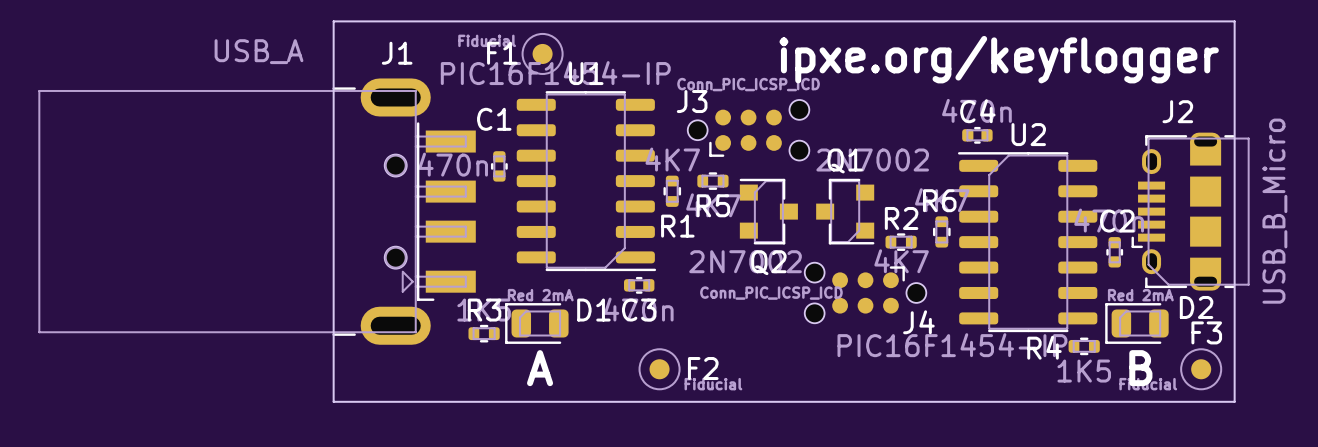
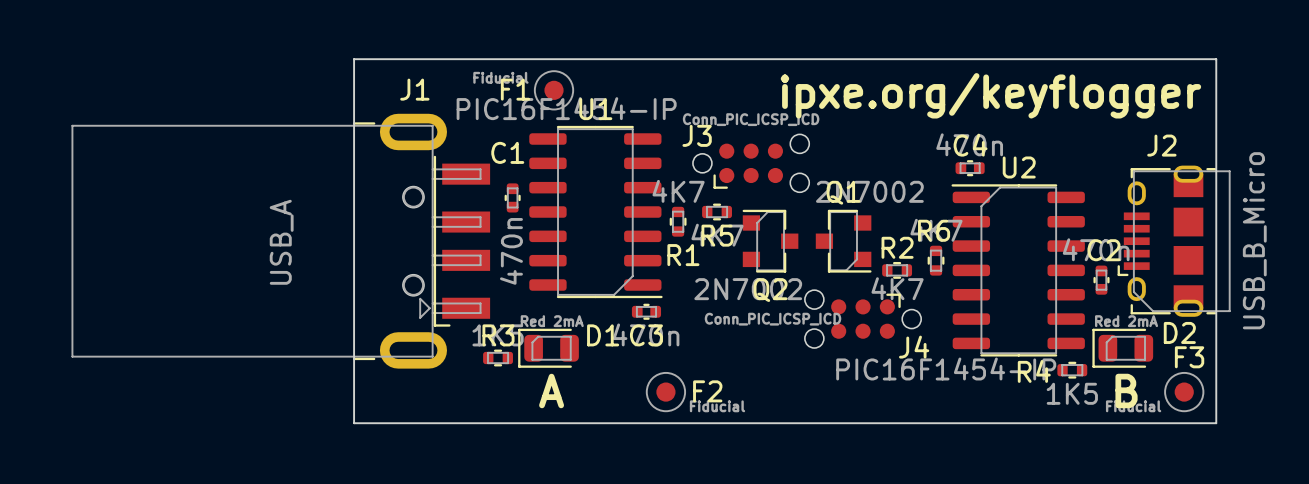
J1 value rotation: 0° (259, 51) -> 90° counterclockwise (281, 242)
J1 value position: USB_A (259, 51) -> USB_A (281, 242)
C1 value rotation: 0° (453, 164) -> 90° counterclockwise (511, 251)

